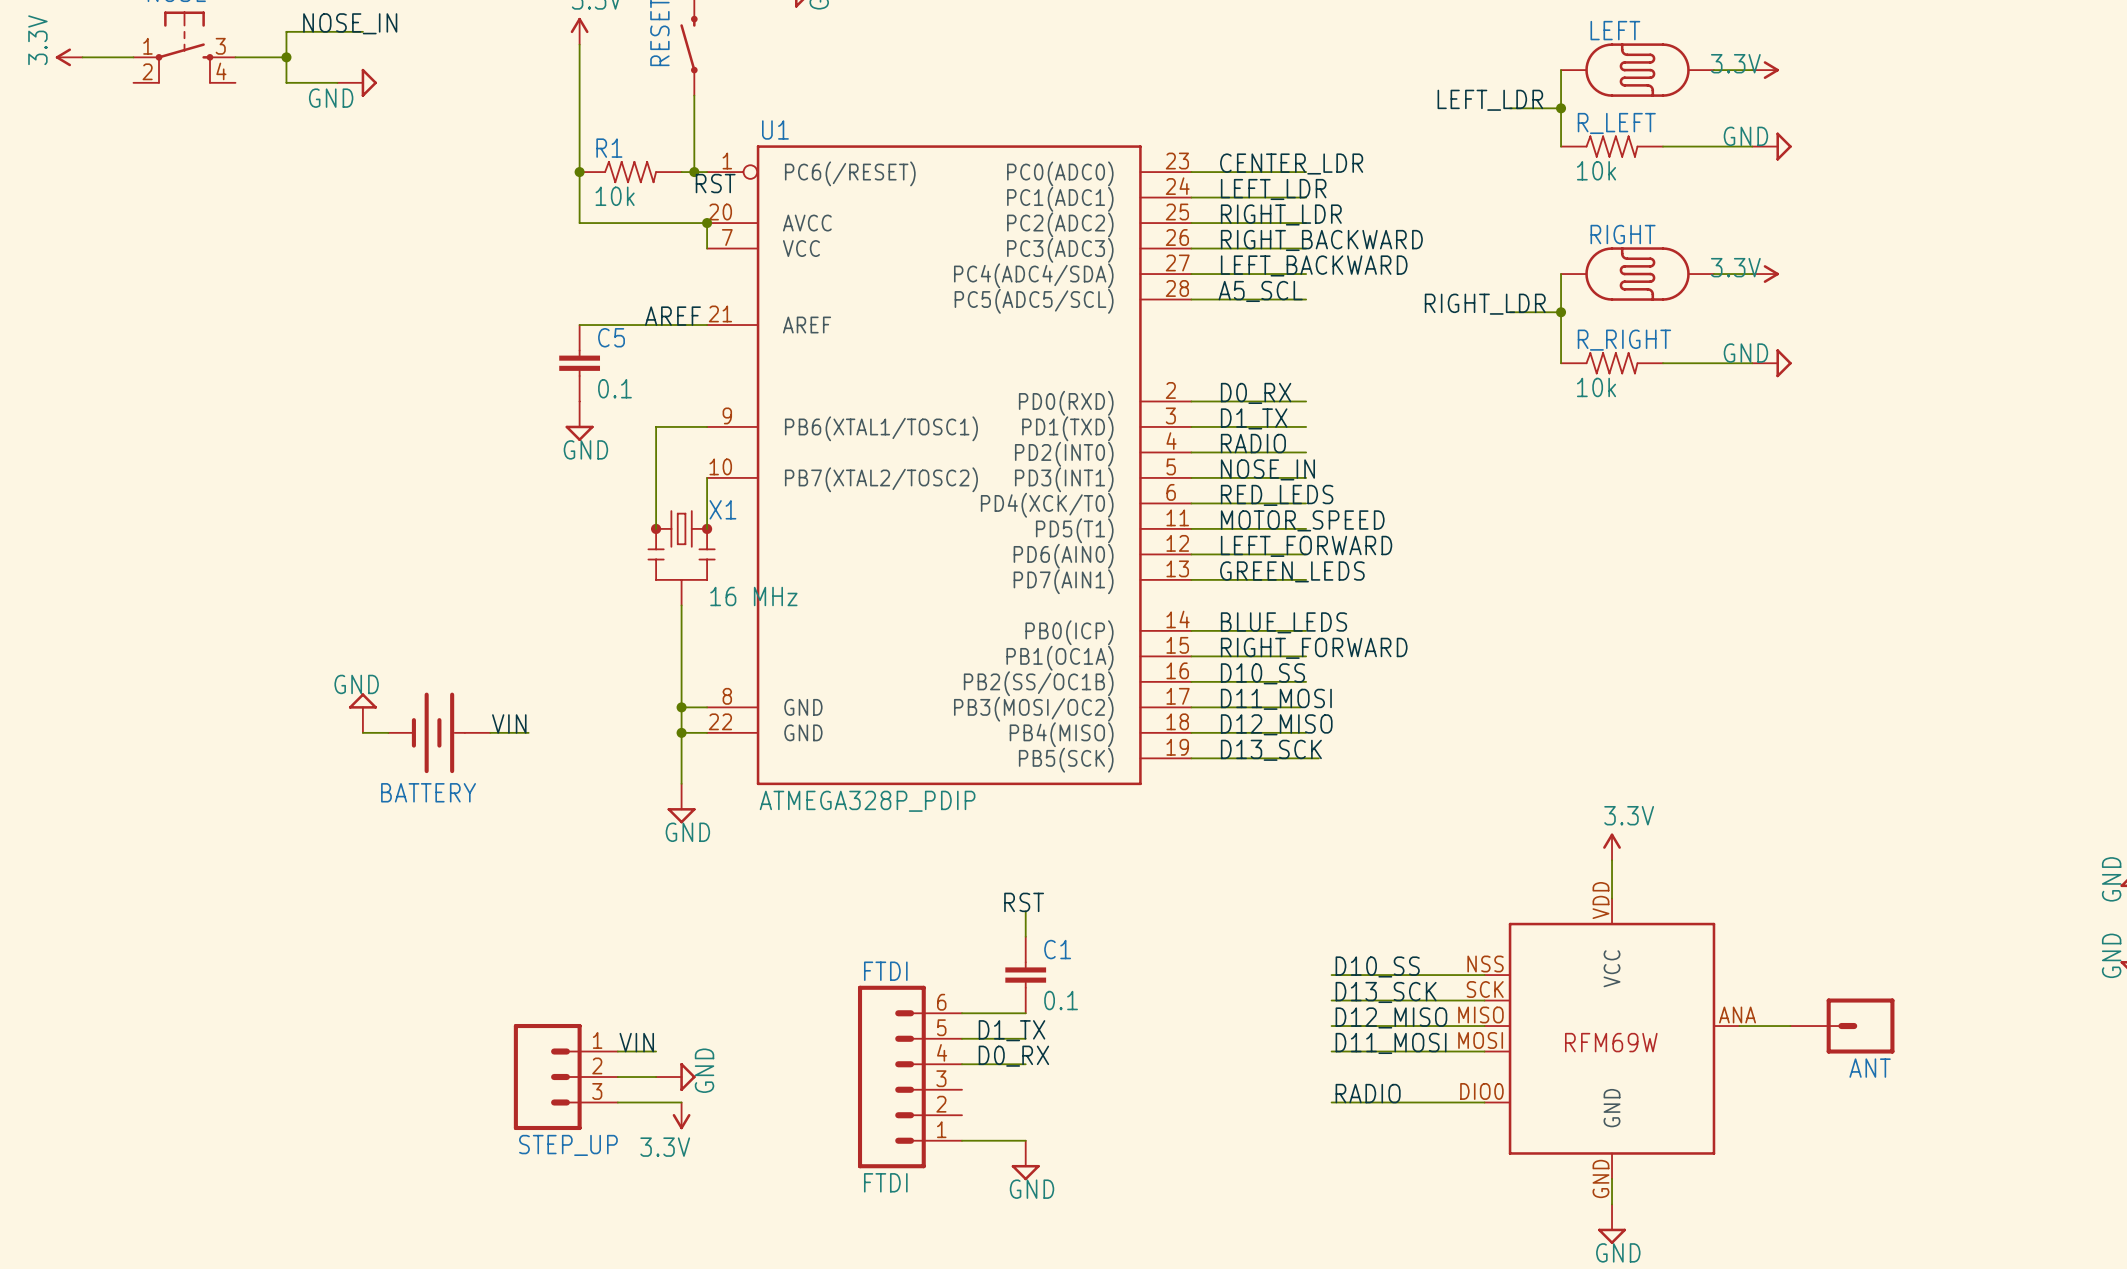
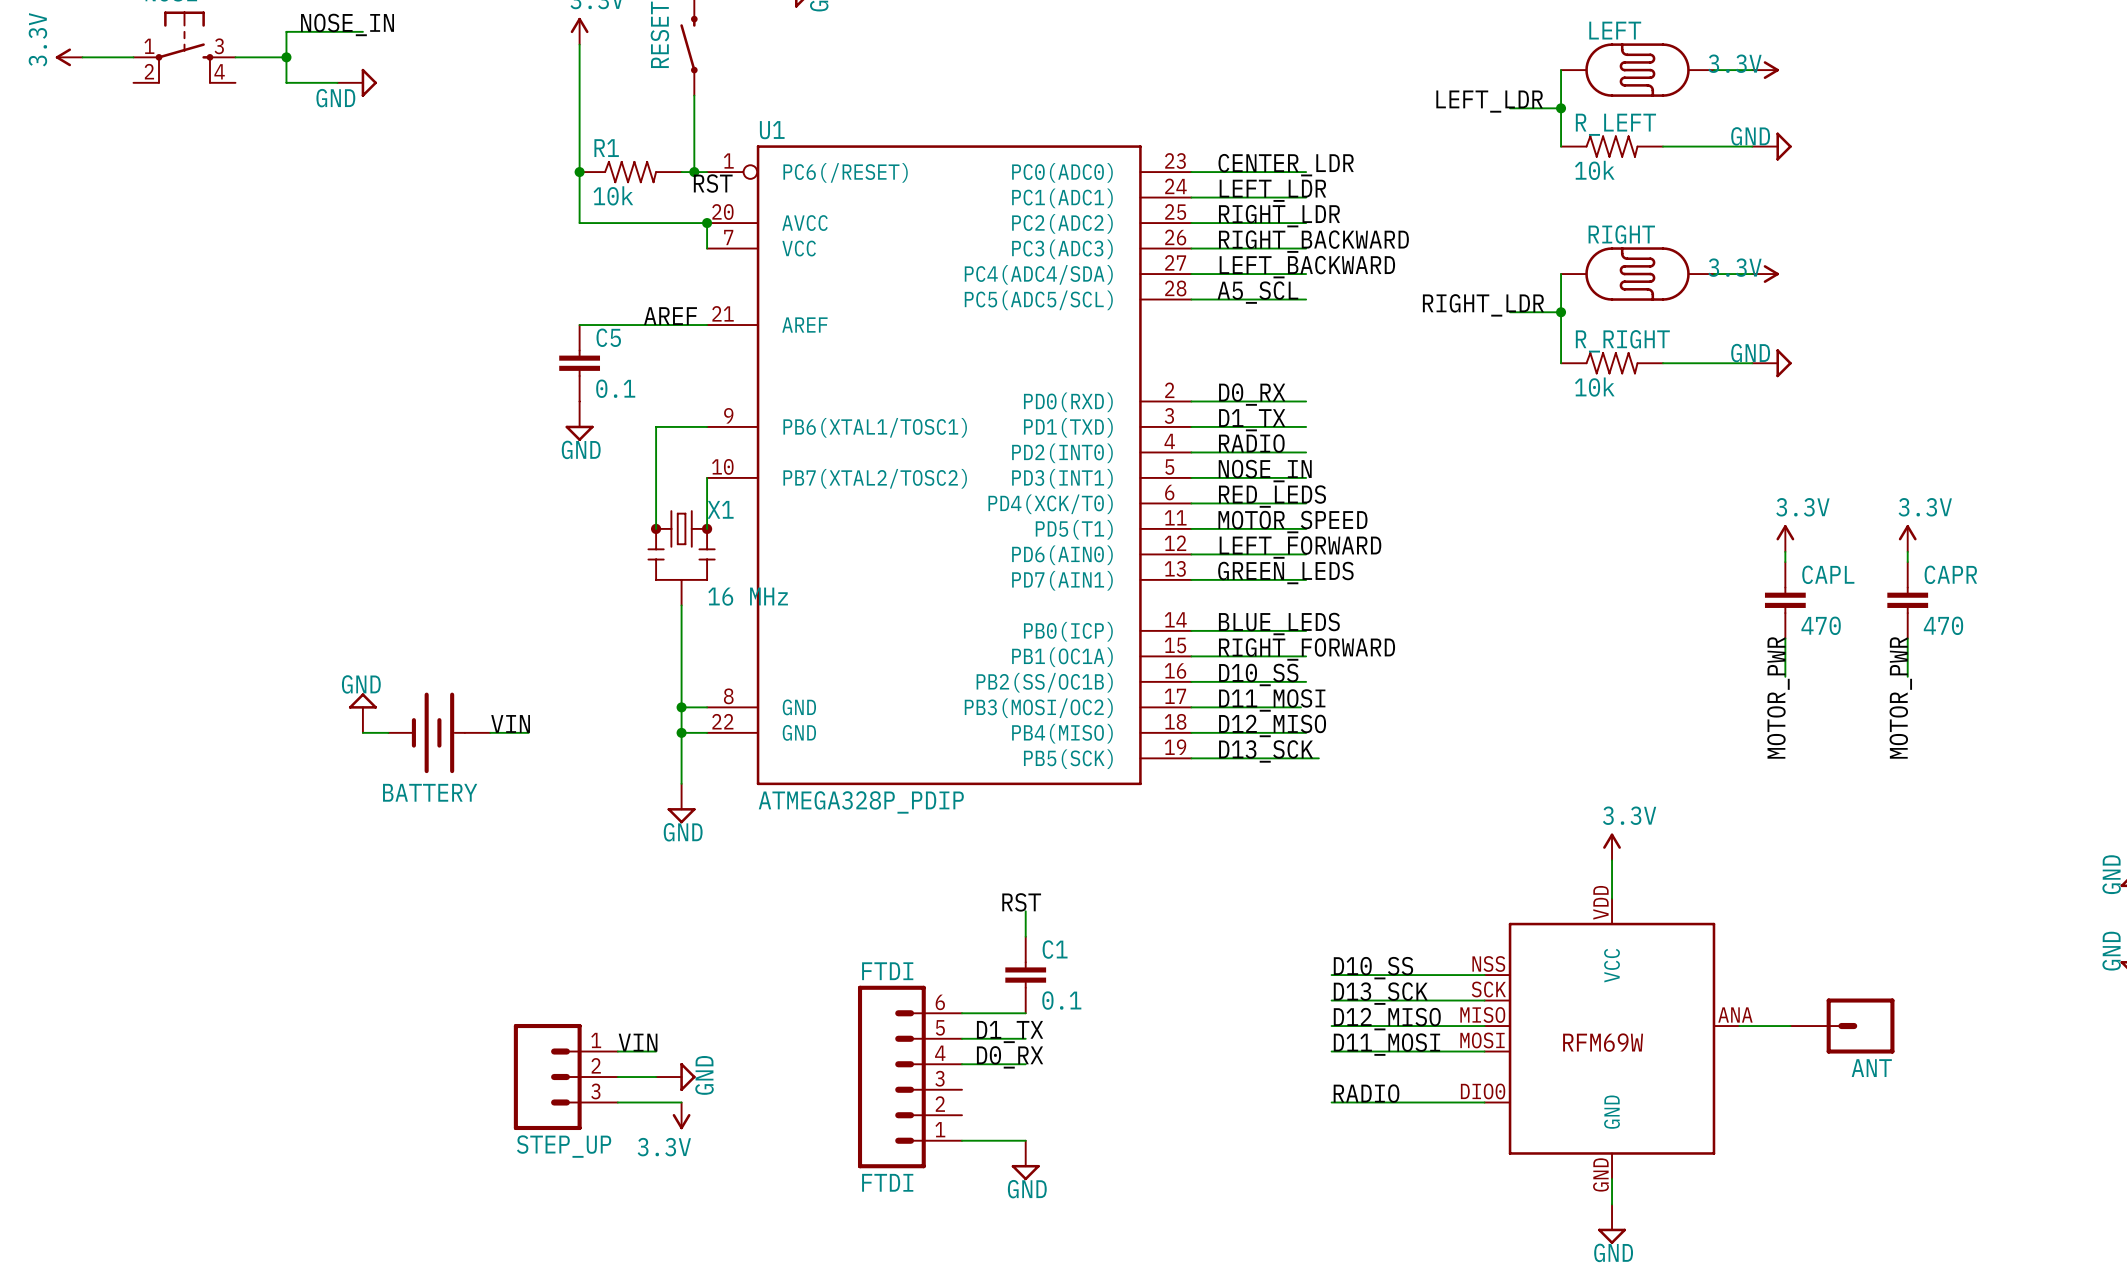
power symbol: none -> 3.3V (1785, 538)
power symbol: none -> 3.3V (1907, 538)
wire: none -> (1785, 551) (1785, 562)
wire: none -> (1907, 551) (1907, 562)
CAPL: none -> 470 (1785, 600)
CAPR: none -> 470 (1907, 600)
wire: none -> (1785, 638) (1785, 676)
wire: none -> (1907, 638) (1907, 676)
label: none -> MOTOR_PWR (1778, 697)
label: none -> MOTOR_PWR (1900, 697)

